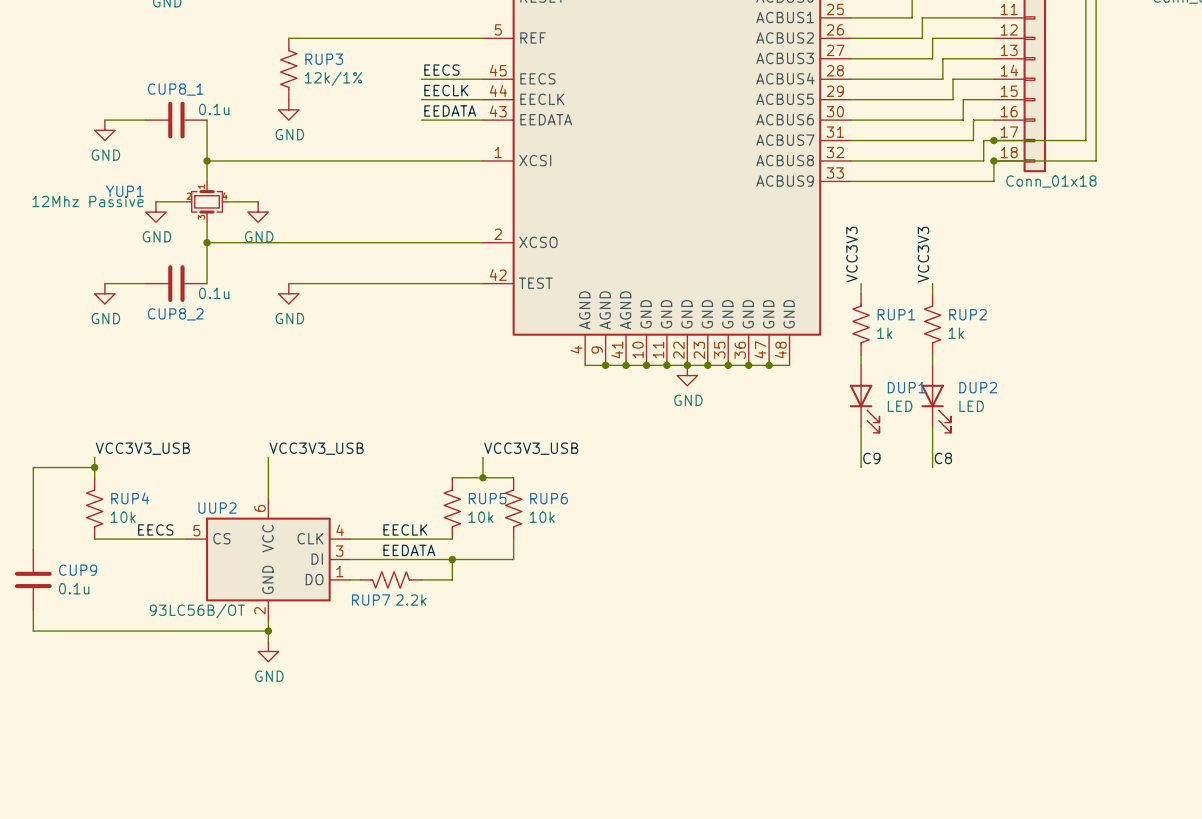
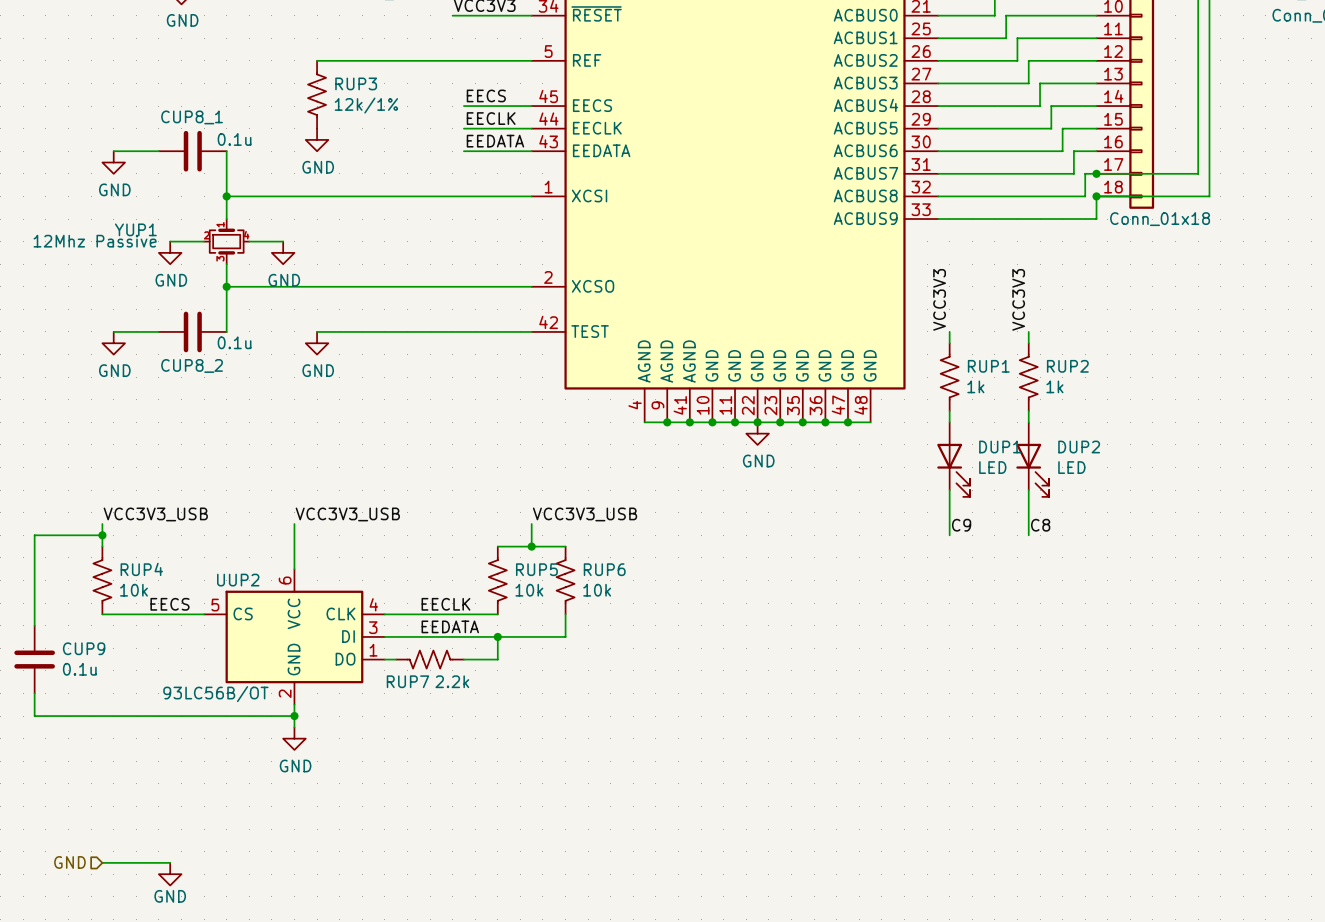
hierarchical label: none -> GND (69, 862)
wire: none -> (102, 862) (170, 862)
power symbol: none -> GND (170, 874)

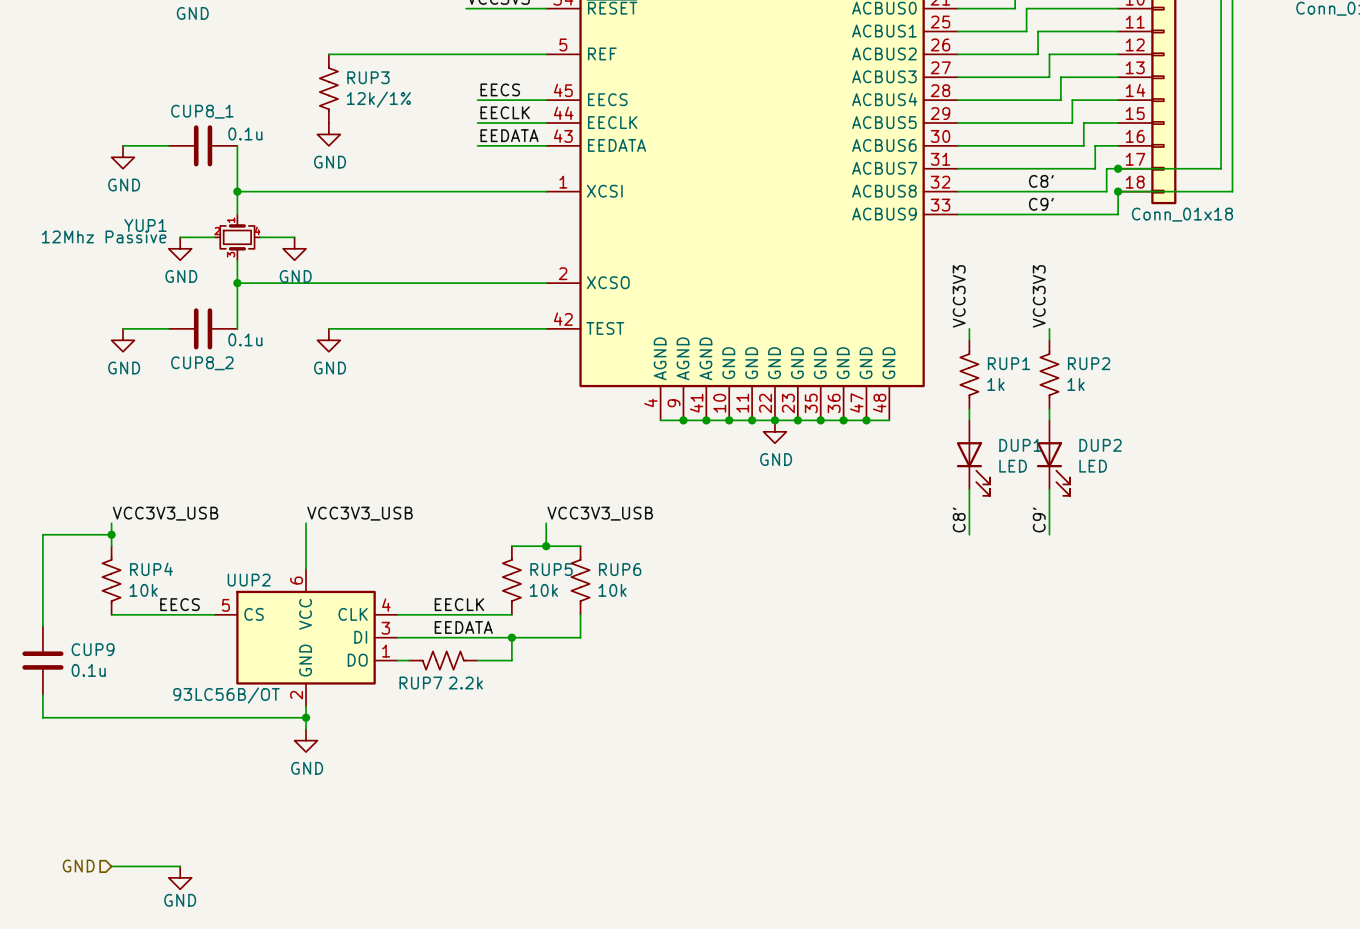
label: none -> C8' (1041, 181)
label: none -> C9' (1041, 204)
label: C9 (961, 525) -> C8' (959, 519)
label: C8 (1040, 525) -> C9' (1039, 519)

